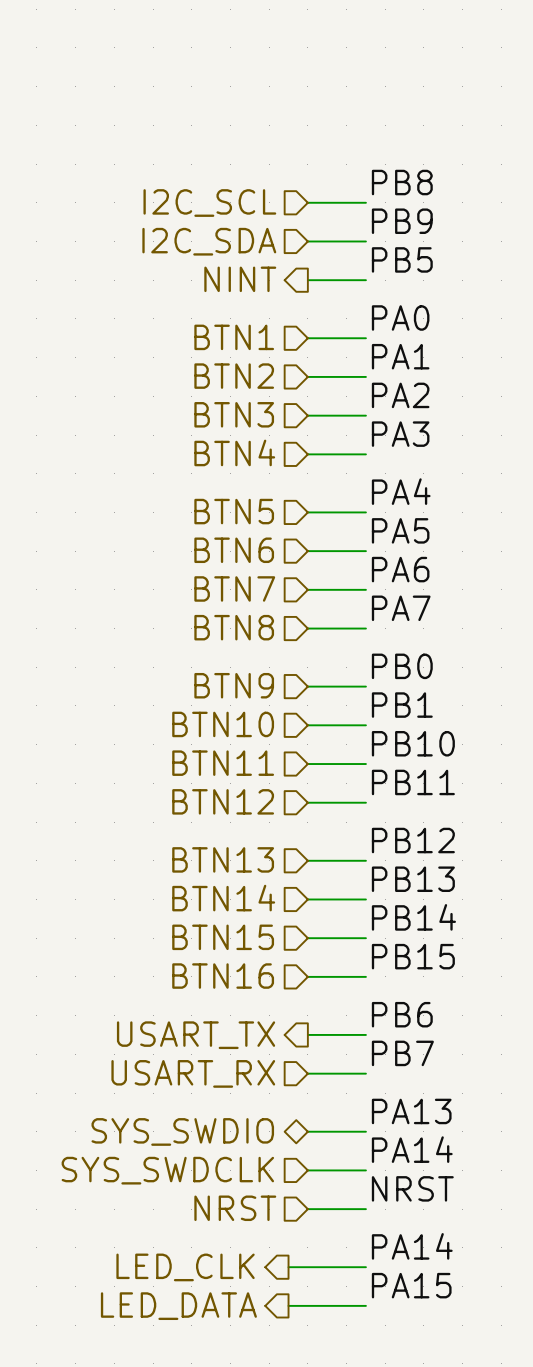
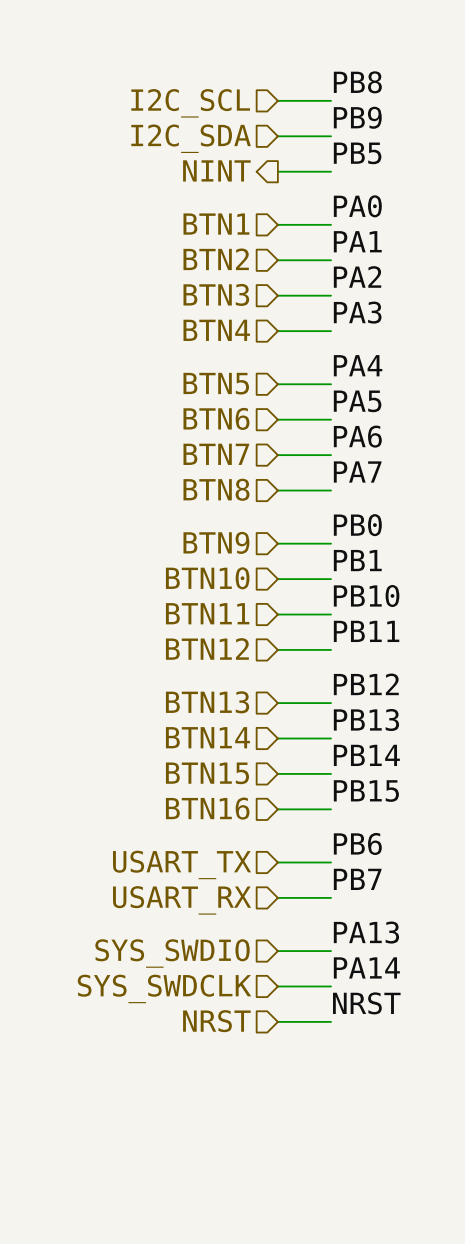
wire: none -> (277, 100) (331, 100)
label: none -> PB9 (357, 117)
hierarchical label: none -> I2C_SDA (191, 138)
wire: none -> (277, 136) (331, 136)
label: none -> PB5 (357, 153)
hierarchical label: none -> NINT (216, 170)
label position: PB8 (402, 182) -> PB8 (357, 82)
wire: (307, 202) (365, 202) -> (277, 171) (331, 171)
hierarchical label position: I2C_SCL (209, 203) -> I2C_SCL (190, 103)
label: PB9 (402, 221) -> PA0 (357, 206)
hierarchical label: I2C_SDA (209, 241) -> BTN1 (216, 224)
label: PB5 (402, 259) -> PA1 (357, 241)
hierarchical label shape: output (240, 279) -> input (216, 259)
hierarchical label: NINT (240, 279) -> BTN2 (216, 259)
label: none -> PA2 (357, 276)
label: PA0 (400, 317) -> none
hierarchical label: none -> BTN3 (216, 294)
hierarchical label: BTN1 (234, 337) -> none
label: none -> PA3 (357, 312)
wire: (307, 338) (365, 338) -> (277, 295) (331, 295)
hierarchical label: none -> BTN4 (216, 330)
label: PA1 (400, 356) -> none
hierarchical label: BTN2 (234, 376) -> none
wire: (307, 376) (365, 376) -> (277, 331) (331, 331)
label: PA2 (400, 395) -> PA4 (358, 365)
hierarchical label: BTN3 (234, 414) -> BTN5 (216, 383)
label: PA3 (400, 434) -> PA5 (357, 401)
hierarchical label: BTN4 (234, 452) -> BTN6 (216, 418)
label: none -> PA6 (357, 436)
label: PA4 (401, 491) -> none
hierarchical label: none -> BTN7 (216, 454)
hierarchical label: BTN5 (234, 511) -> none
label: none -> PA7 (357, 471)
wire: (307, 512) (365, 512) -> (277, 455) (331, 455)
hierarchical label: none -> BTN8 (216, 489)
label: PA5 (400, 530) -> none
hierarchical label: BTN6 (234, 550) -> none
wire: (307, 551) (365, 551) -> (277, 490) (331, 490)
label: PA6 (400, 569) -> PB0 (357, 525)
hierarchical label: BTN7 (234, 588) -> BTN9 (216, 542)
label: PA7 (401, 608) -> PB1 (357, 560)
hierarchical label: BTN8 (234, 627) -> BTN10 (207, 578)
hierarchical label: none -> BTN11 (207, 613)
label: PB0 (402, 666) -> PB10 (366, 596)
hierarchical label: BTN9 (234, 685) -> none
wire: (307, 686) (365, 686) -> (277, 614) (331, 614)
hierarchical label: none -> BTN12 (207, 648)
label: PB1 (402, 705) -> PB11 (366, 631)
hierarchical label: BTN10 (223, 724) -> none
wire: (307, 725) (365, 725) -> (277, 649) (331, 649)
label: PB10 (413, 743) -> PB12 (366, 684)
hierarchical label: BTN11 (223, 763) -> BTN13 (207, 702)
label: PB11 (413, 782) -> PB13 (366, 719)
hierarchical label: BTN12 (223, 801) -> BTN14 (207, 737)
label: none -> PB14 (366, 755)
hierarchical label: none -> BTN15 (207, 773)
label: PB12 (413, 840) -> none
hierarchical label: BTN13 (223, 859) -> none
label: none -> PB15 (366, 791)
wire: (307, 860) (365, 860) -> (277, 773) (331, 773)
hierarchical label: none -> BTN16 (207, 808)
label: PB13 (413, 879) -> none
hierarchical label: BTN14 (223, 898) -> none
wire: (307, 899) (365, 899) -> (277, 809) (331, 809)
label: PB14 (413, 917) -> PB6 (357, 843)
hierarchical label: BTN15 (223, 937) -> USART_TX (182, 864)
label: PB15 (413, 956) -> PB7 (357, 879)
hierarchical label: BTN16 (223, 976) -> USART_RX (182, 900)
label: PB6 (402, 1014) -> PA13 (366, 932)
hierarchical label shape: output (196, 1035) -> input (172, 953)
hierarchical label: USART_TX (196, 1035) -> SYS_SWDIO (172, 953)
label: PB7 (402, 1053) -> PA14 (366, 967)
hierarchical label: USART_RX (193, 1073) -> SYS_SWDCLK (164, 988)
label: PA13 (411, 1111) -> none
hierarchical label: SYS_SWDIO (182, 1131) -> none
wire: (307, 1131) (365, 1131) -> (277, 1021) (331, 1021)
label: PA14 (412, 1149) -> none
hierarchical label: SYS_SWDCLK (167, 1170) -> none
wire: (307, 1170) (365, 1170) -> none
label position: NRST (412, 1188) -> NRST (366, 1003)
hierarchical label position: NRST (235, 1208) -> NRST (216, 1021)
wire: (307, 1209) (365, 1209) -> none
label: PA14 (412, 1246) -> none
hierarchical label: LED_CLK (185, 1267) -> none
wire: (288, 1267) (365, 1267) -> none
label: PA15 (411, 1285) -> none
wire: (288, 1305) (365, 1305) -> none
hierarchical label: LED_DATA (178, 1306) -> none

